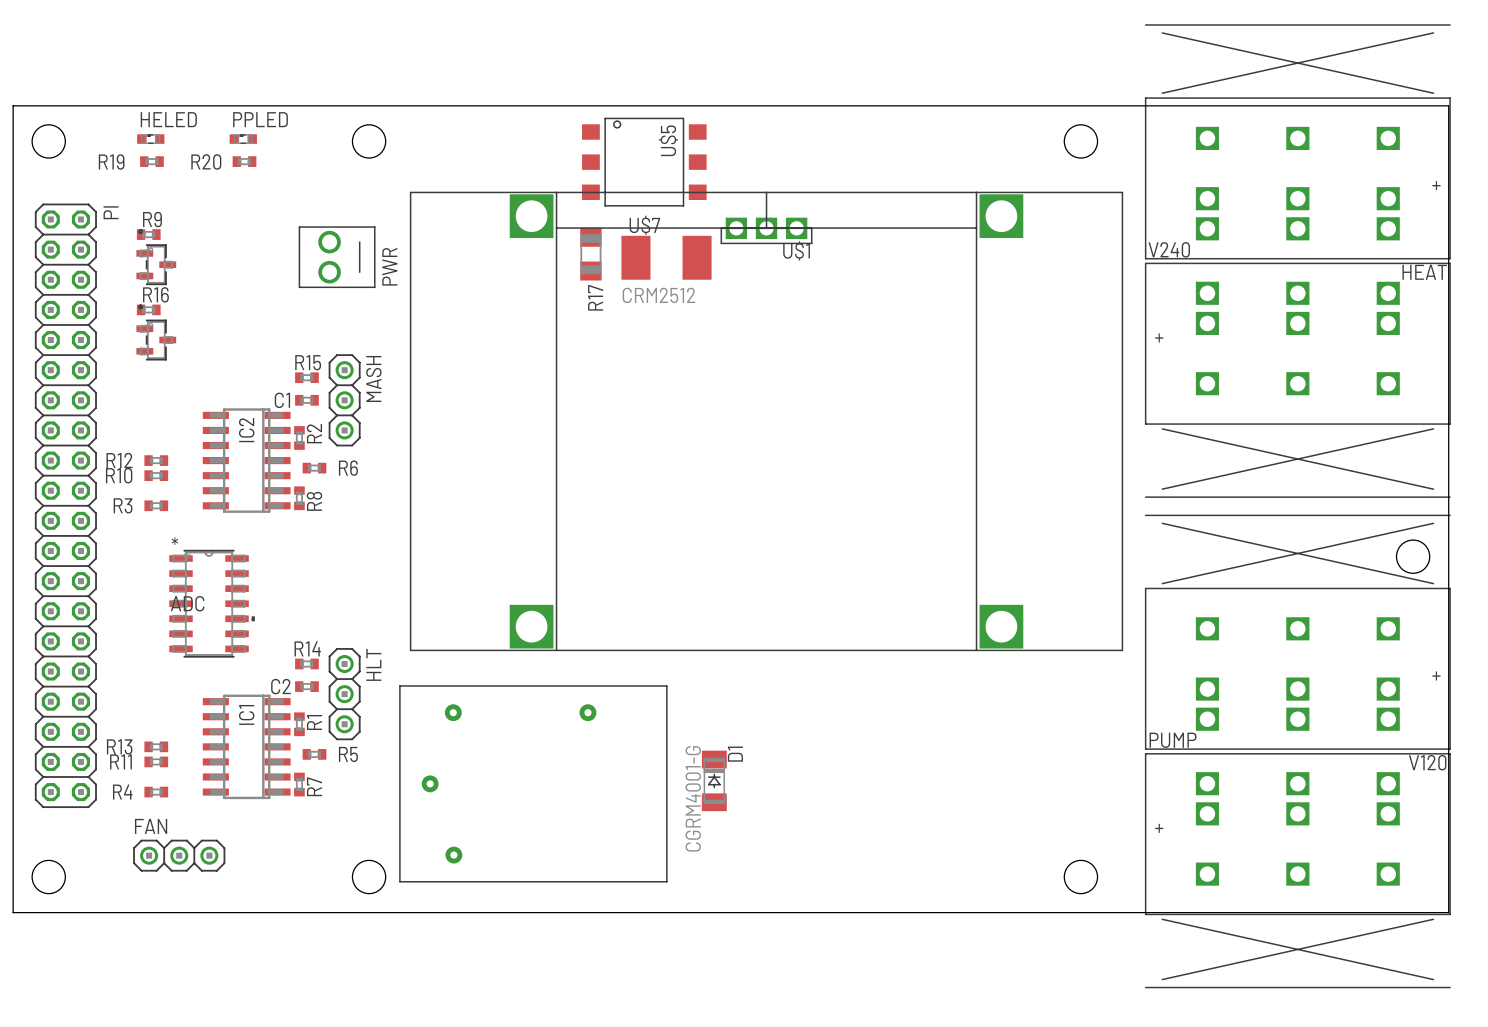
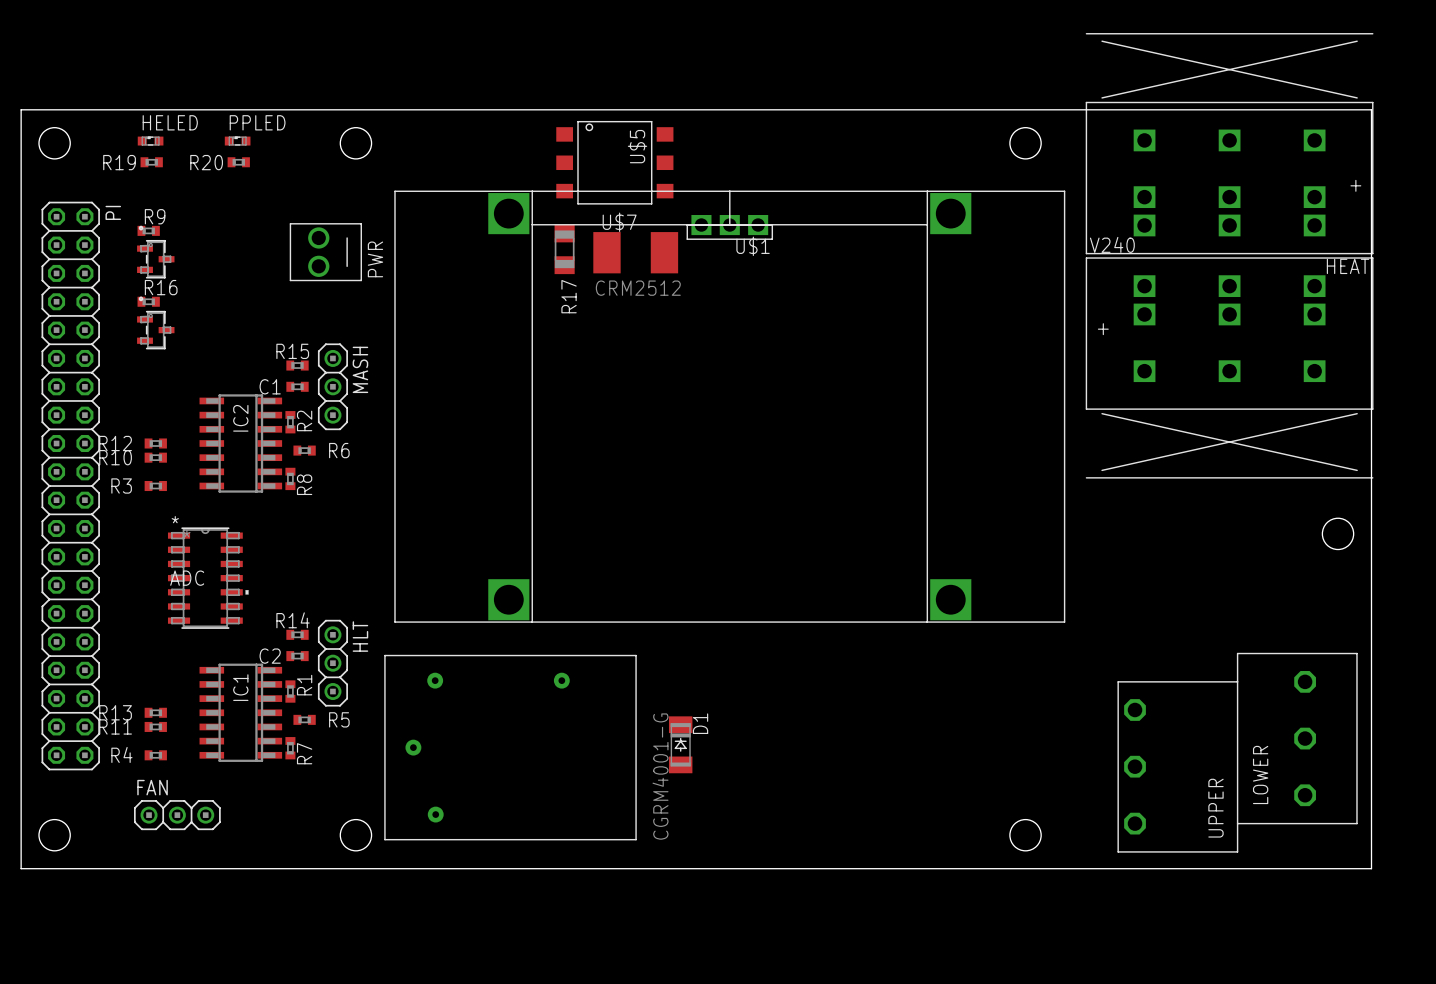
V120: (1297, 632) -> none
part: none -> (1237, 752)
PUMP: (1297, 870) -> none

